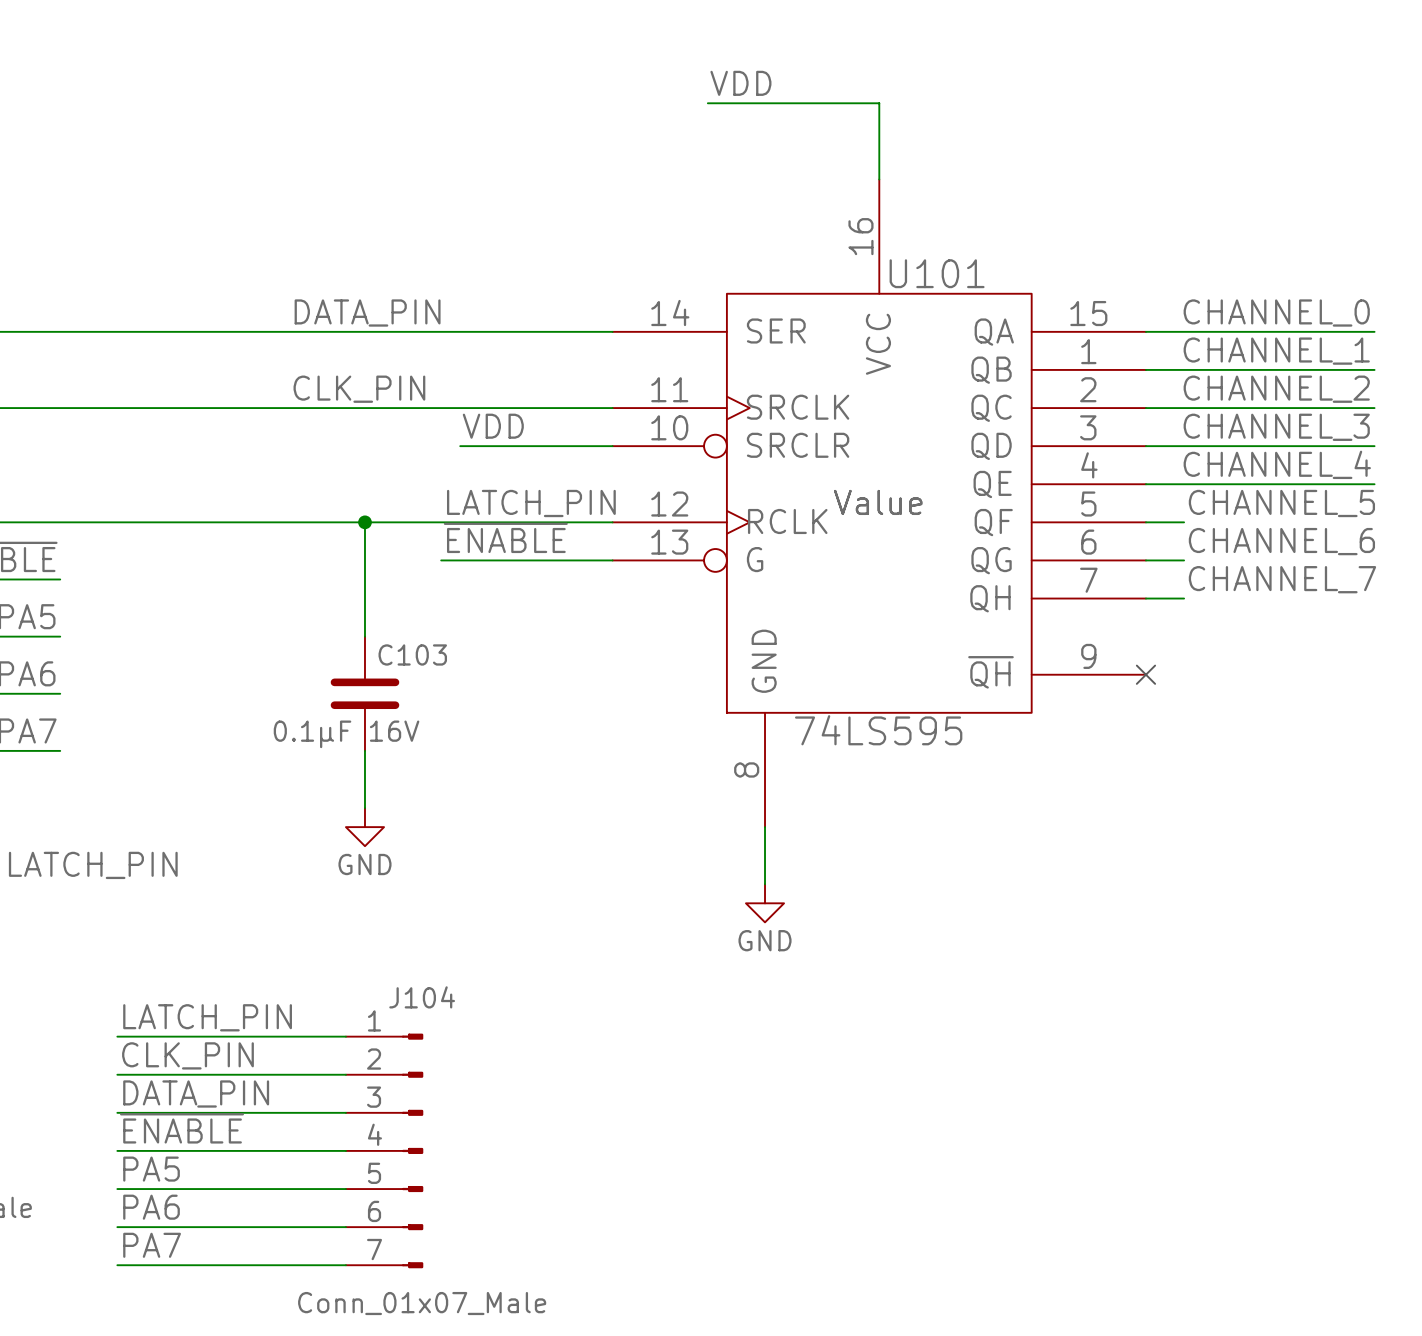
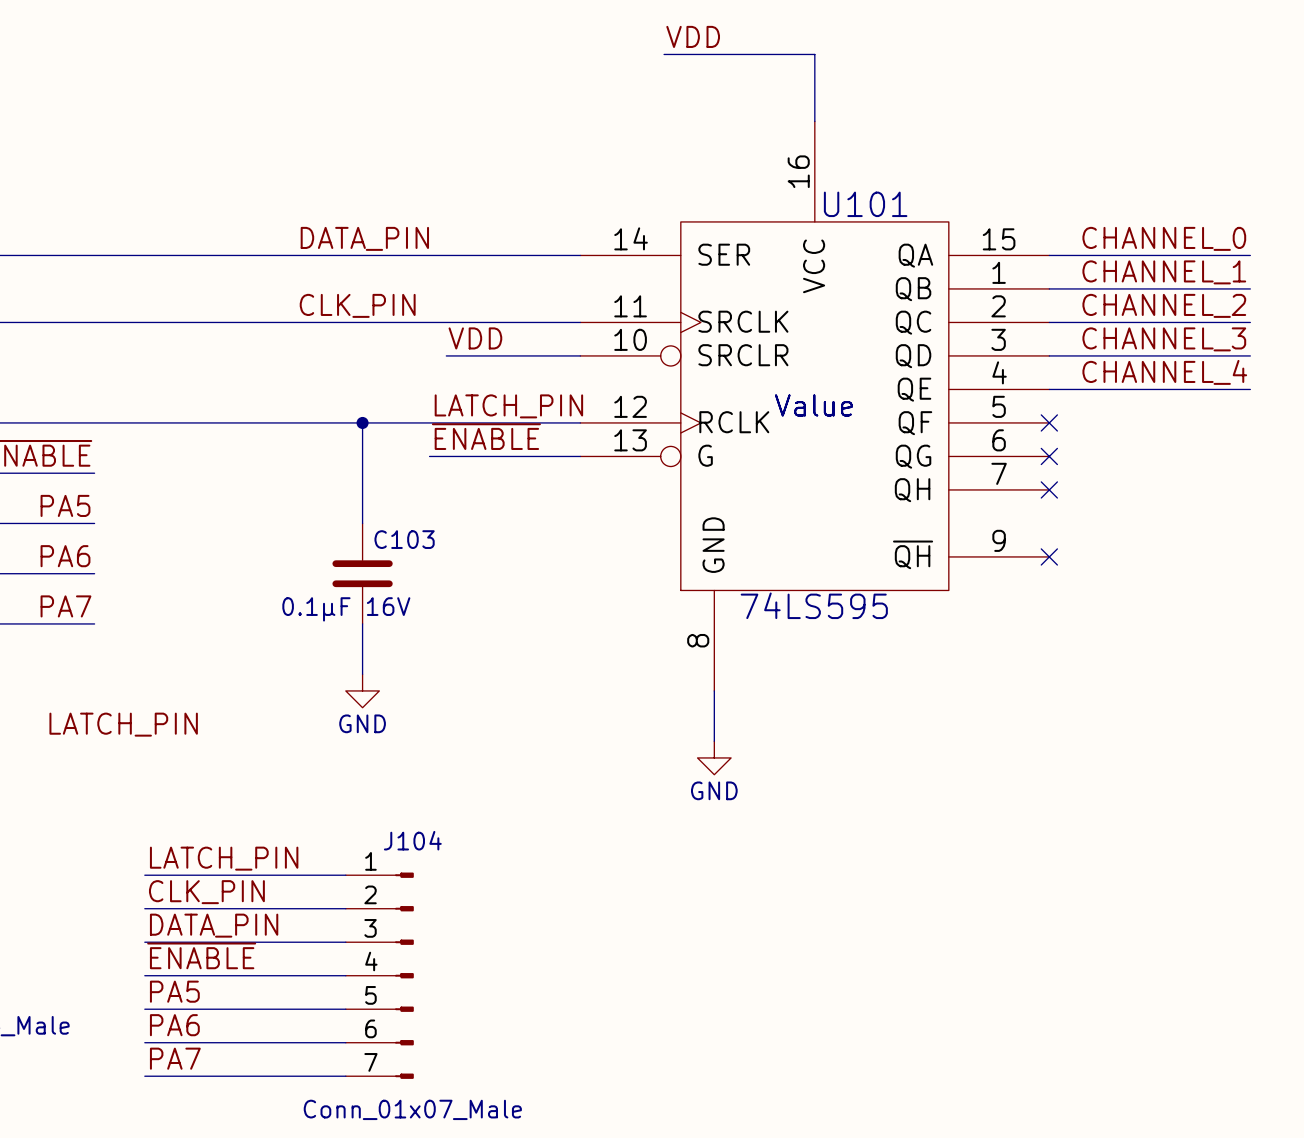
label: CHANNEL_5 (1281, 503) -> none
wire: (1145, 522) (1184, 522) -> none
no-connect mark: none -> (1049, 422)
label: CHANNEL_6 (1281, 541) -> none
wire: (1145, 560) (1184, 560) -> none
no-connect mark: none -> (1049, 456)
label: CHANNEL_7 (1282, 579) -> none
wire: (1145, 598) (1184, 598) -> none
no-connect mark: none -> (1049, 489)

